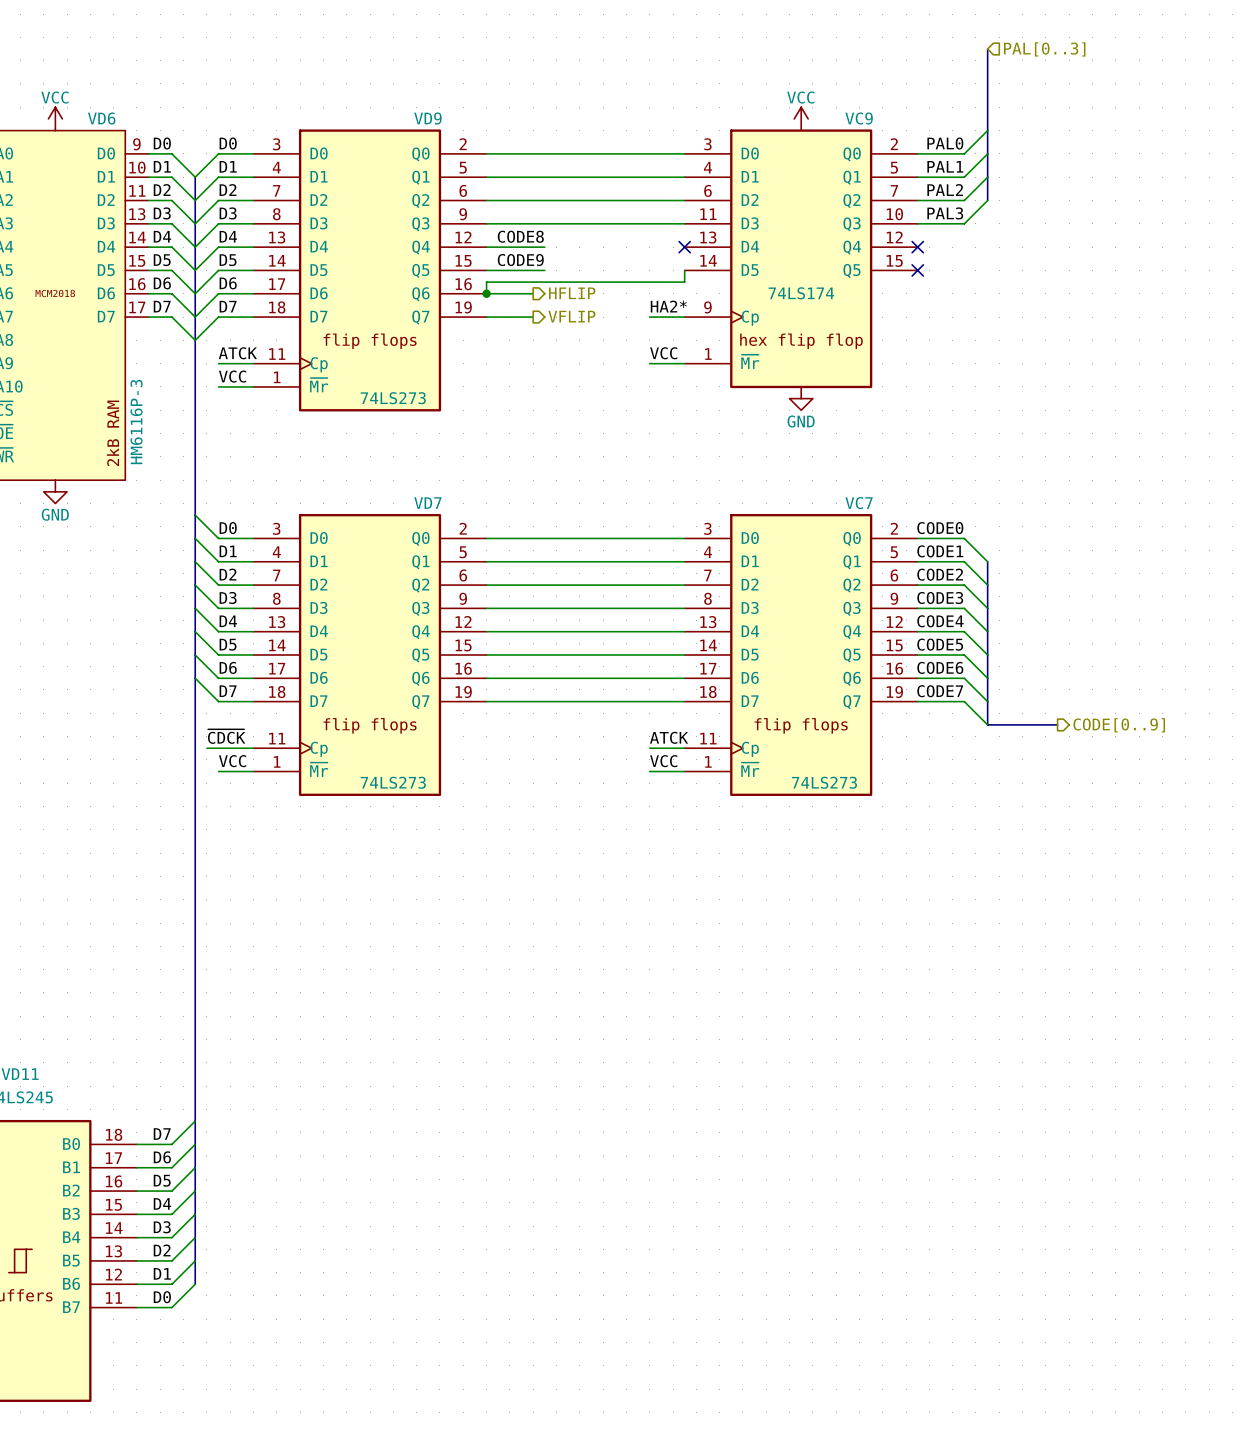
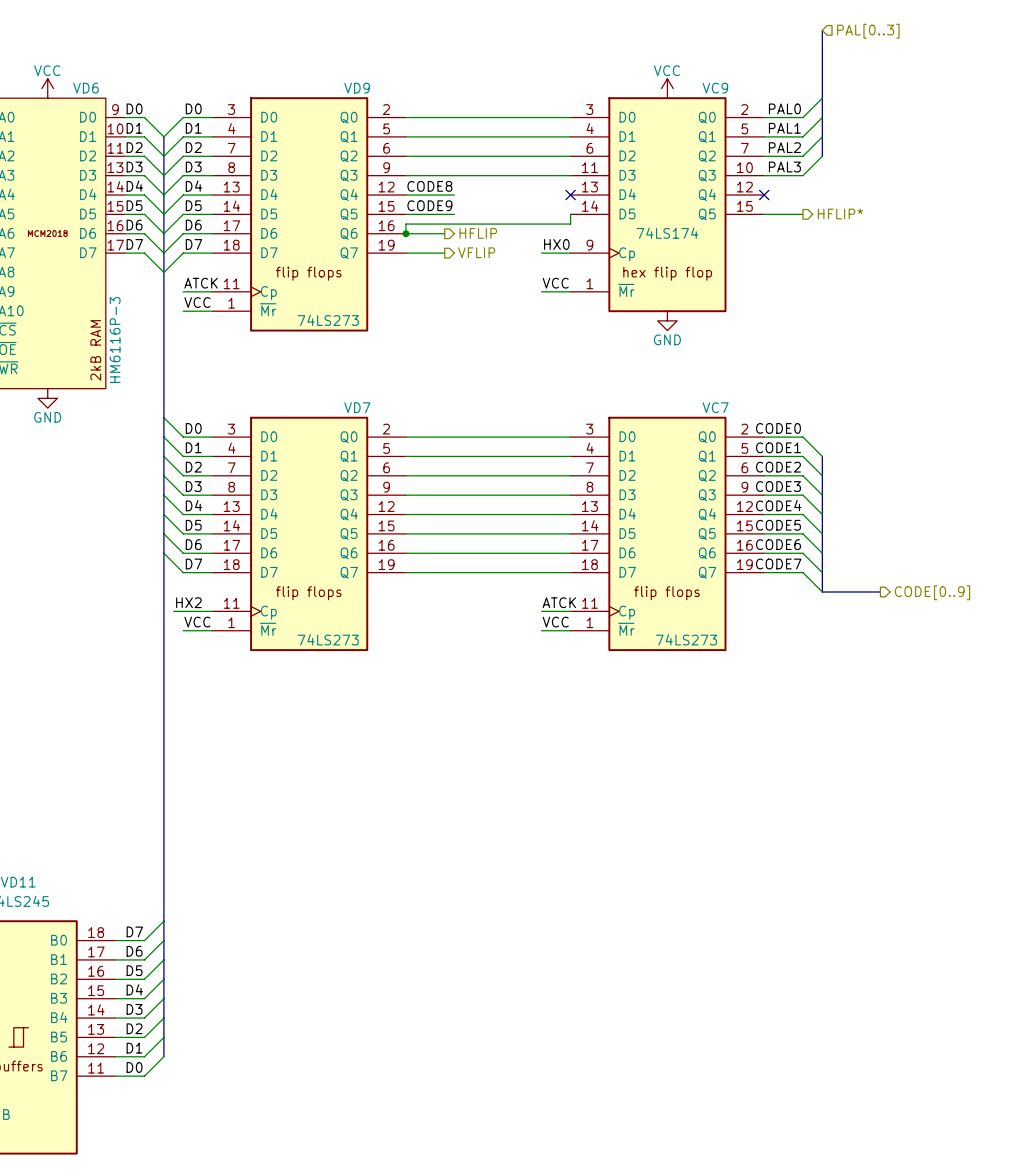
hierarchical label: none -> HFLIP* (840, 214)
wire: none -> (764, 214) (802, 214)
no-connect mark: (917, 270) -> none
label: HA2* (668, 306) -> HX0 (556, 244)
label: ~{CDCK} (226, 736) -> HX2 (188, 602)

